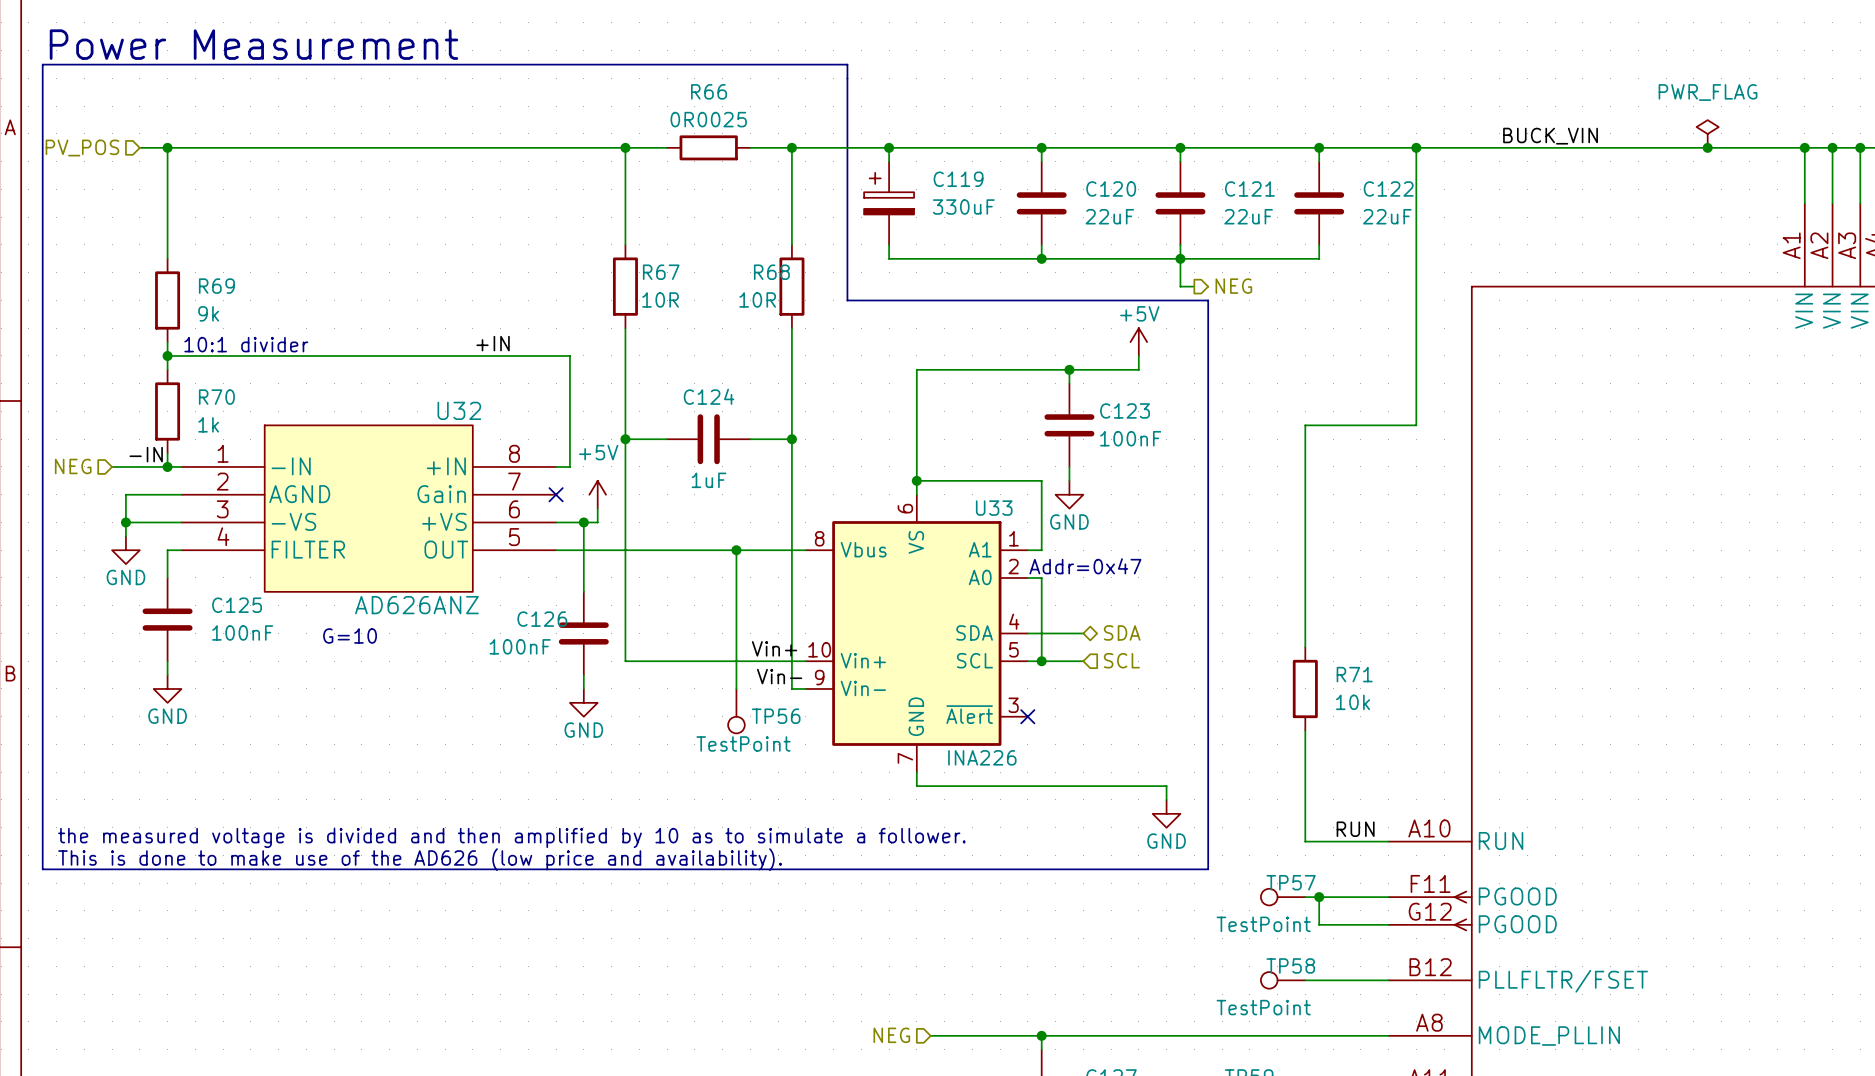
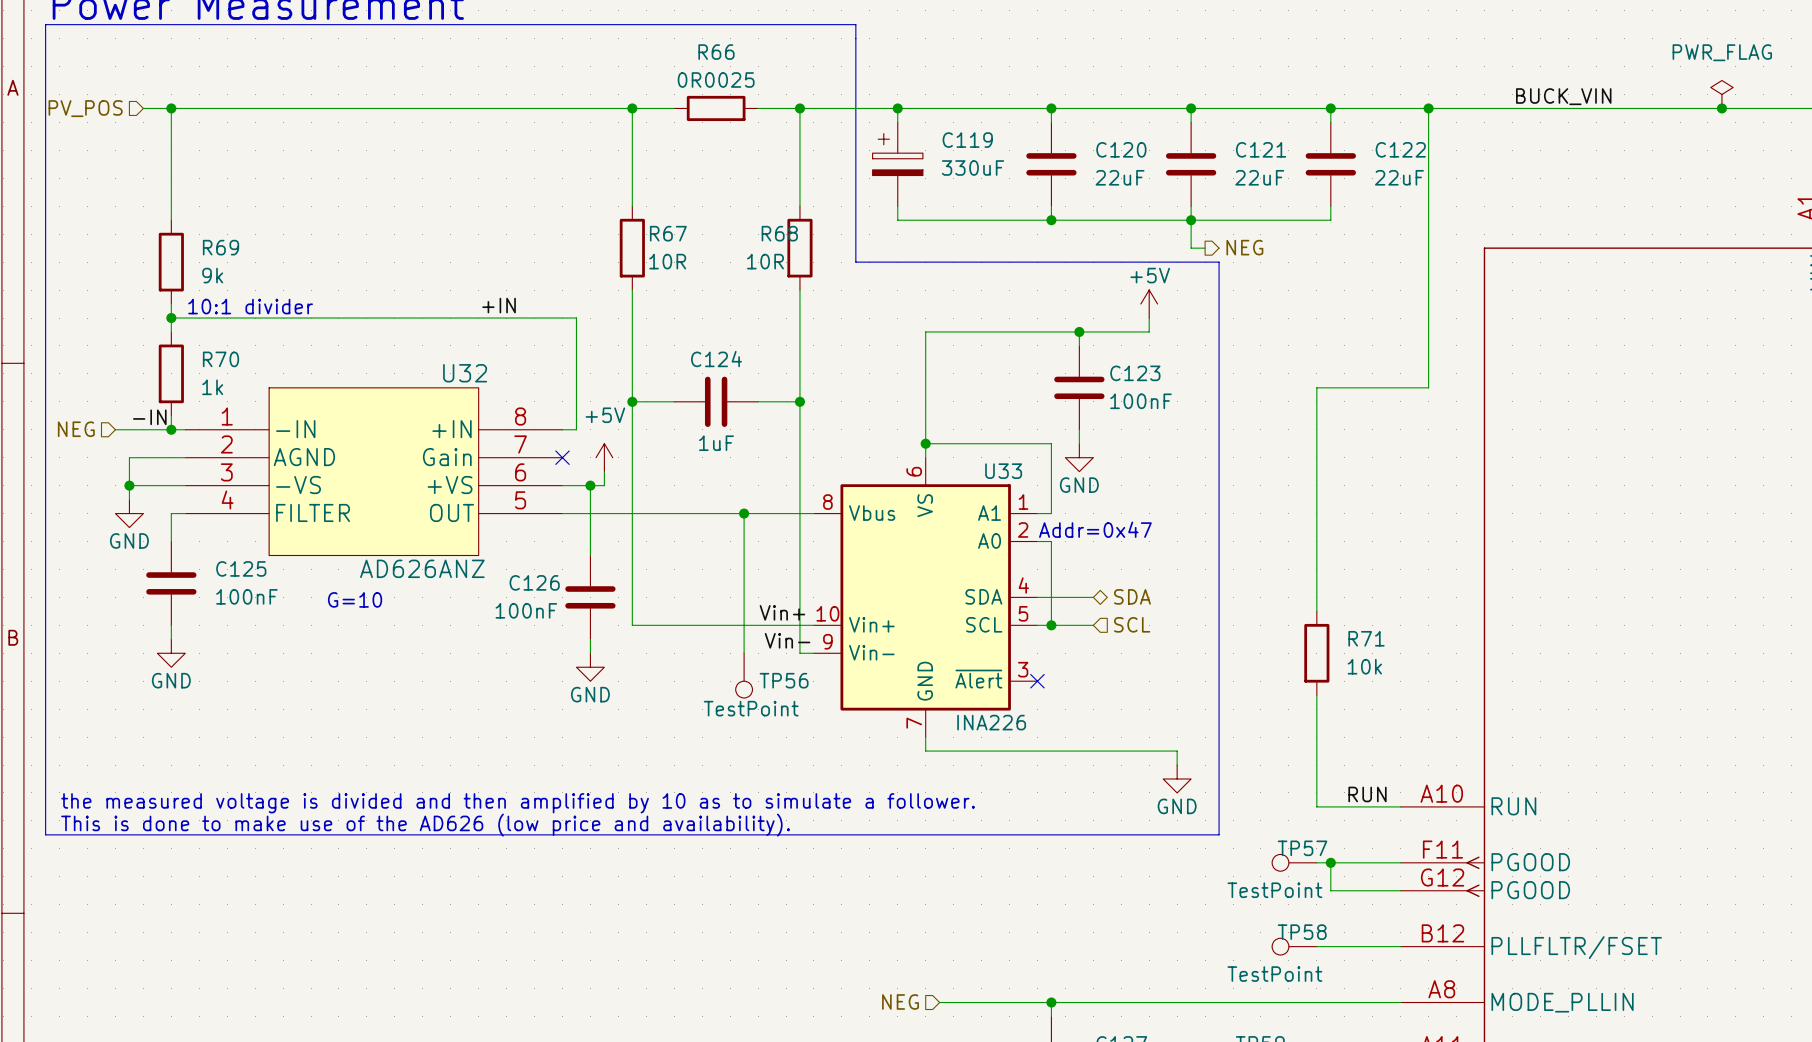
C126 name position: C126 (542, 619) -> C126 (534, 582)

